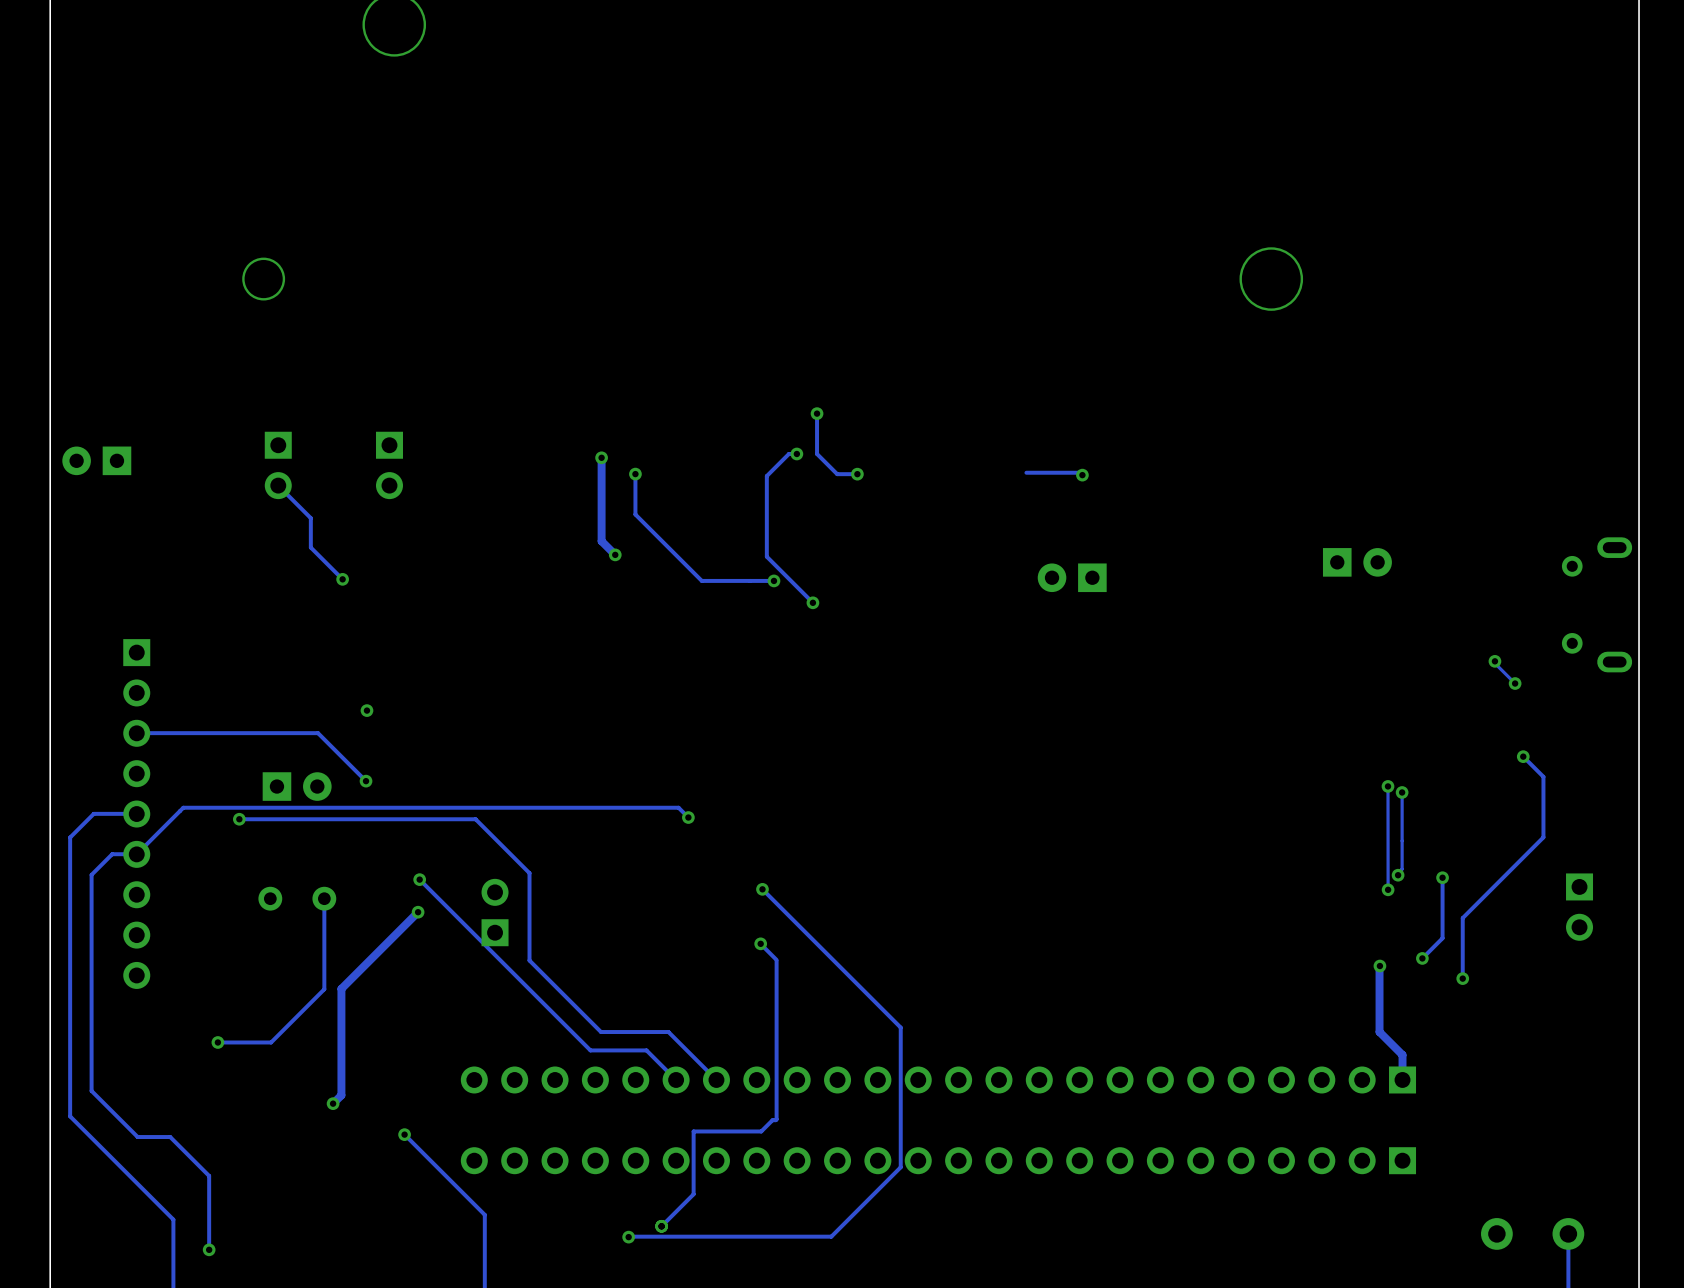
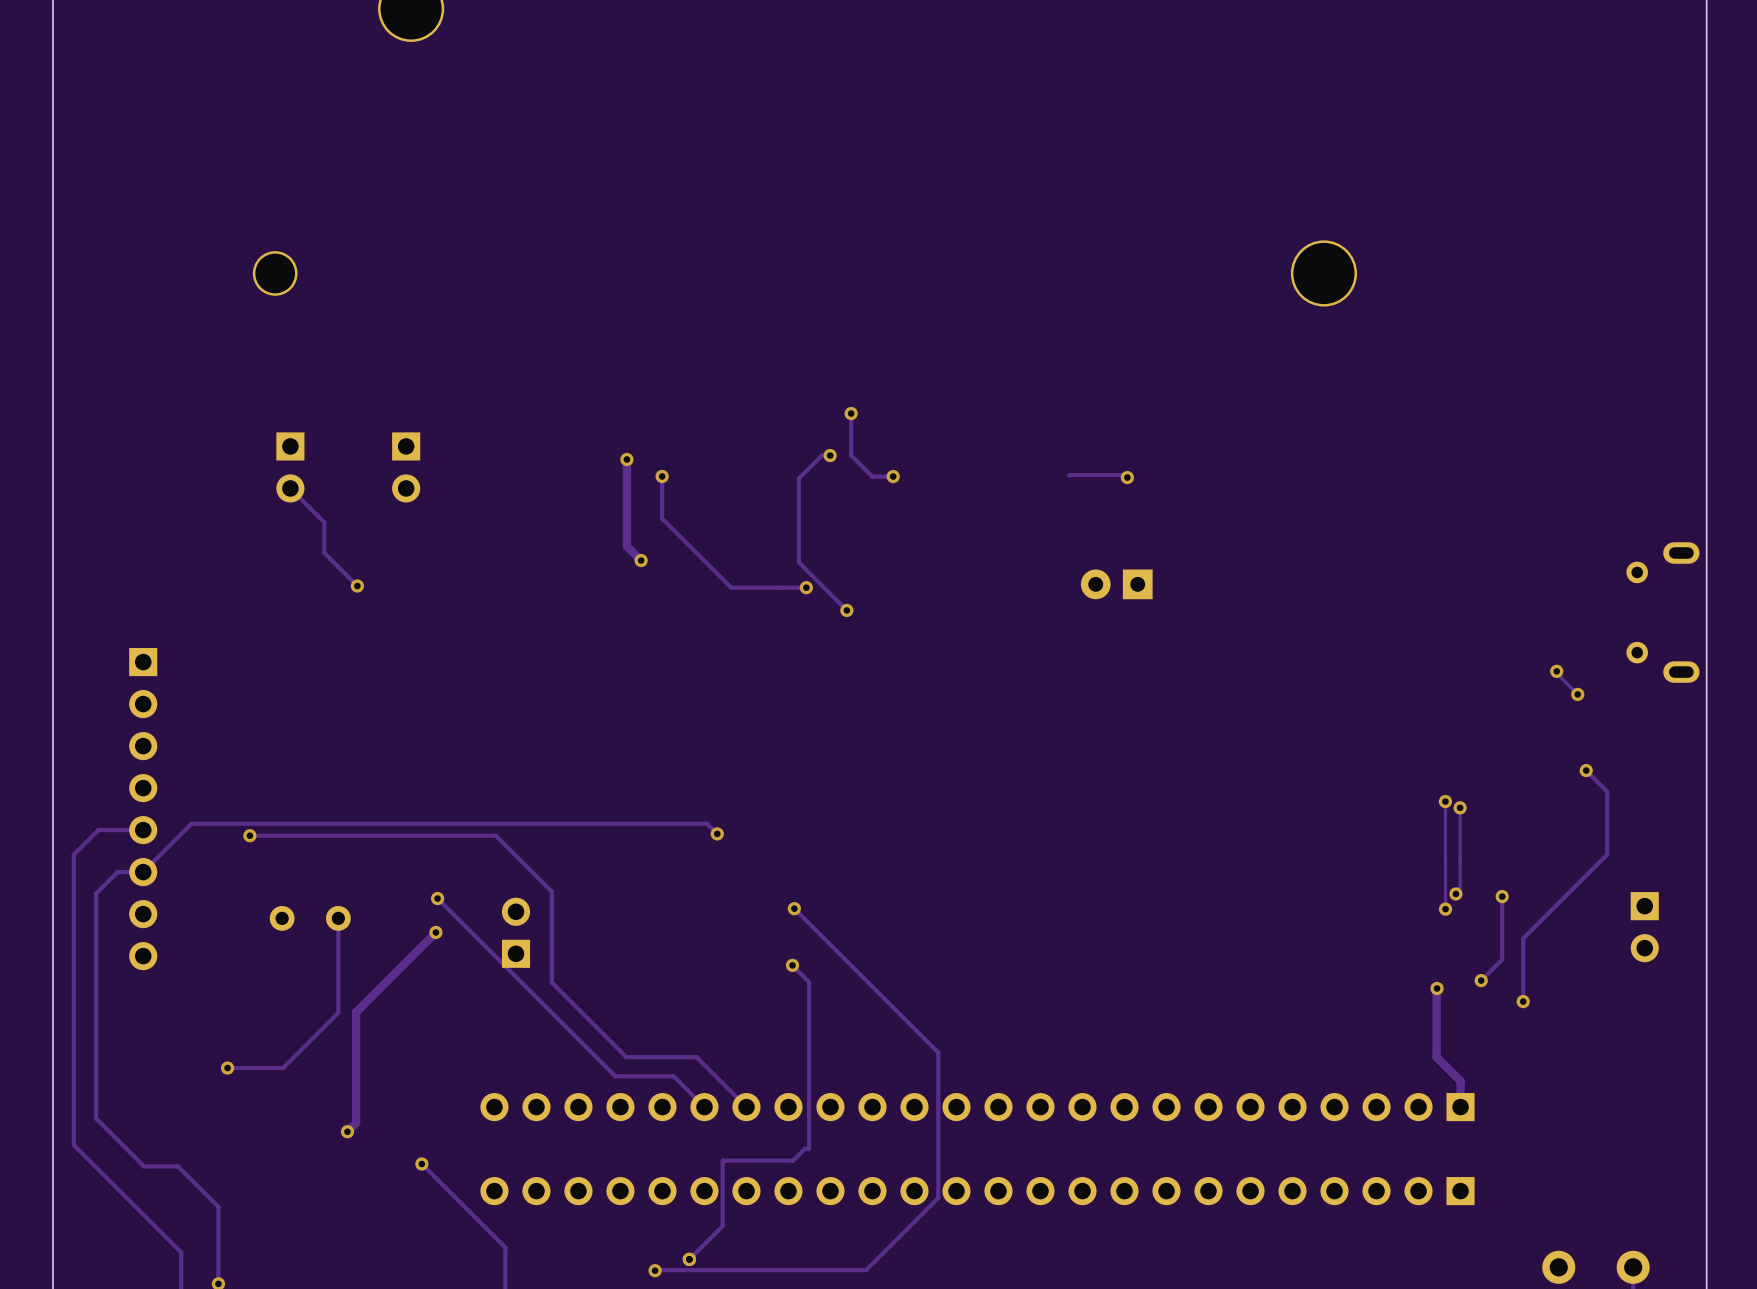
part: (96, 460) -> none
part: (1357, 562) -> none
via: (366, 710) -> none
track: (136, 733) (318, 733) (366, 781) -> none
via: (366, 781) -> none
part: (297, 786) -> none
part: none -> (143, 809)
part: (136, 814) -> none

